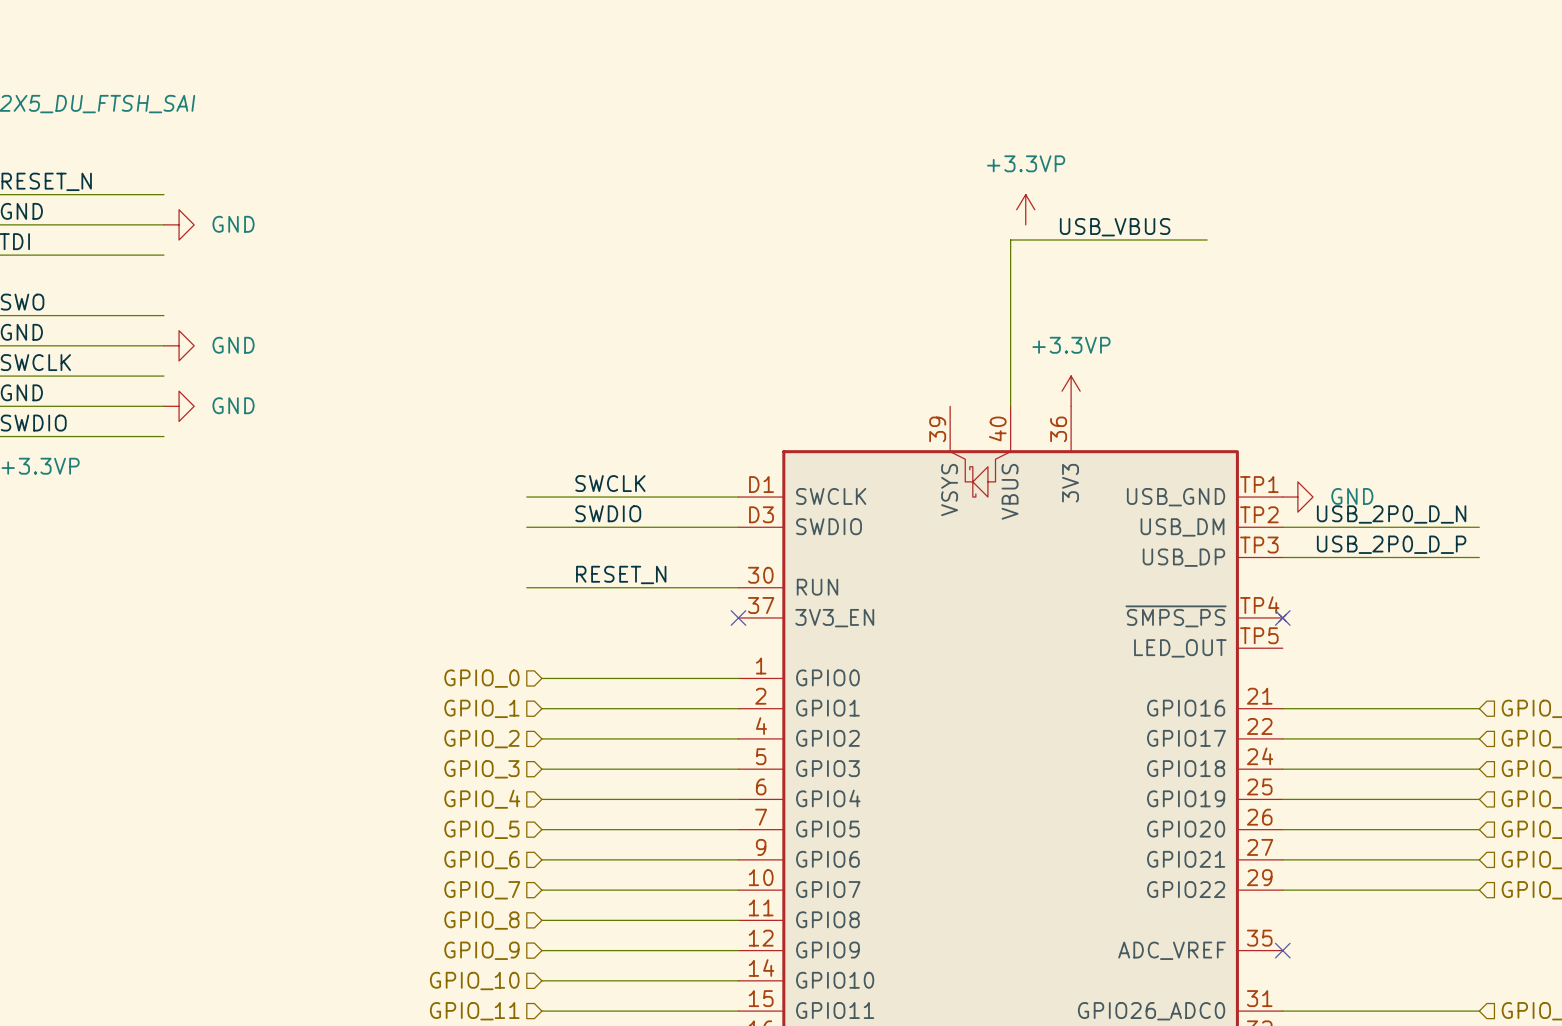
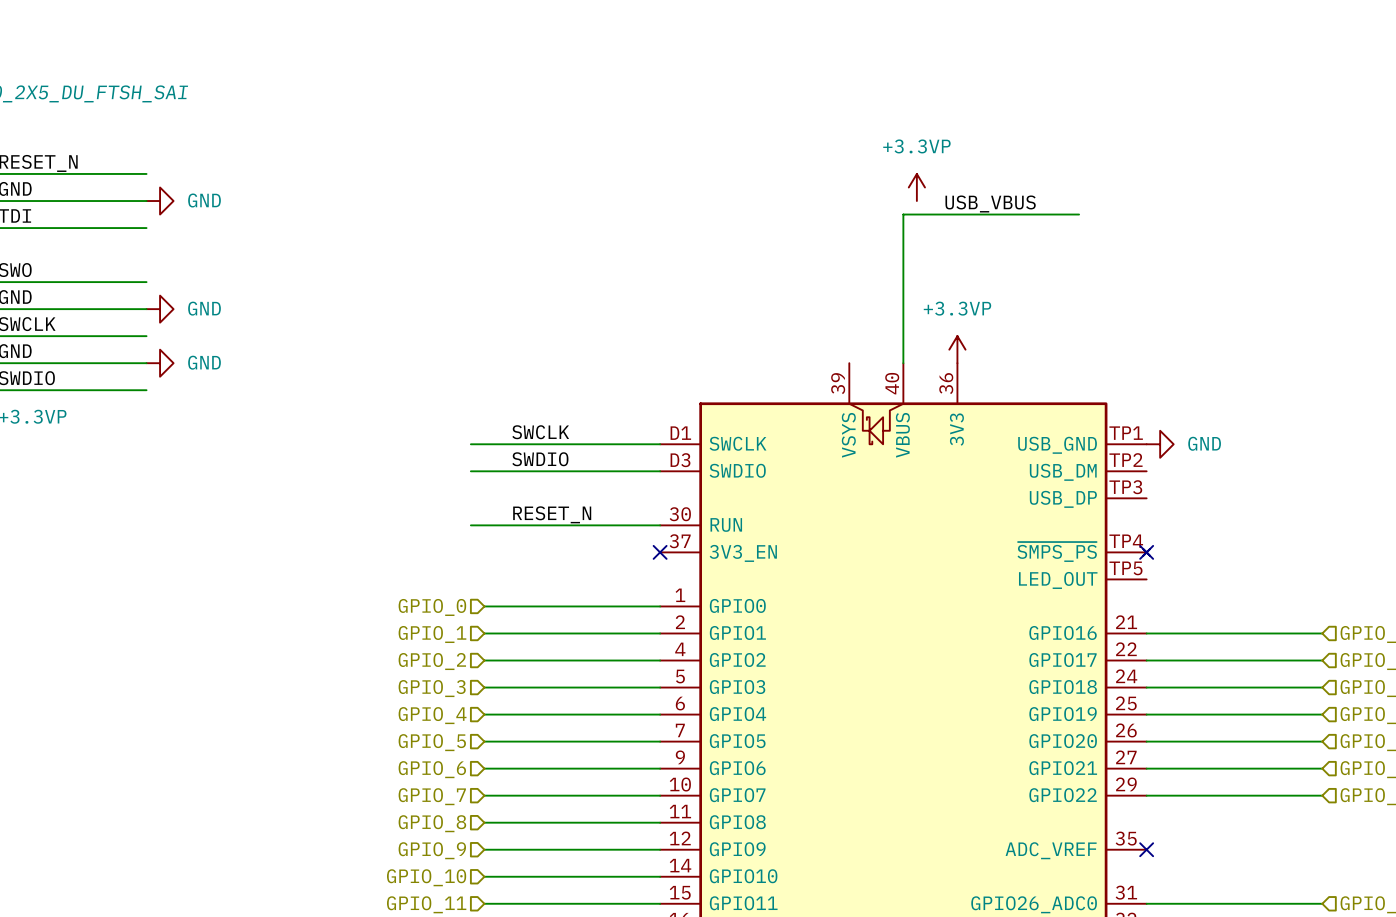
label: USB_2P0_D_N (1391, 514) -> none
wire: (1282, 527) (1479, 527) -> none
label: USB_2P0_D_P (1391, 544) -> none
wire: (1282, 557) (1479, 557) -> none

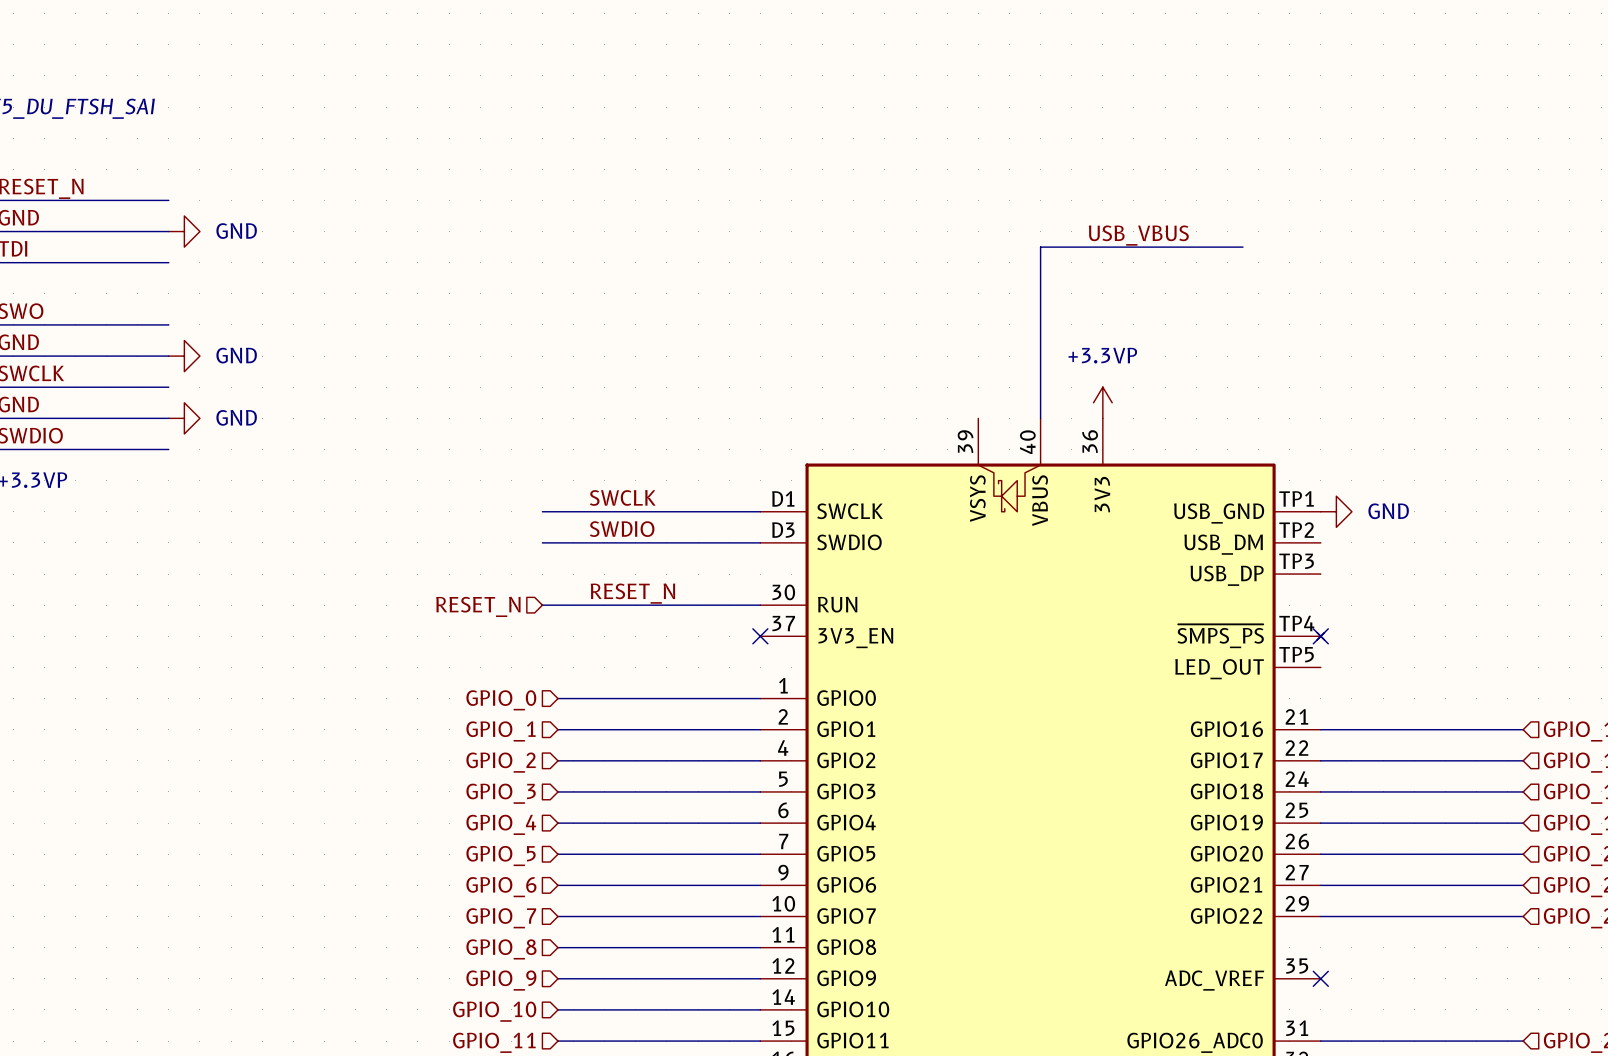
power symbol: +3.3VP (916, 187) -> none
hierarchical label: none -> RESET_N (478, 606)

